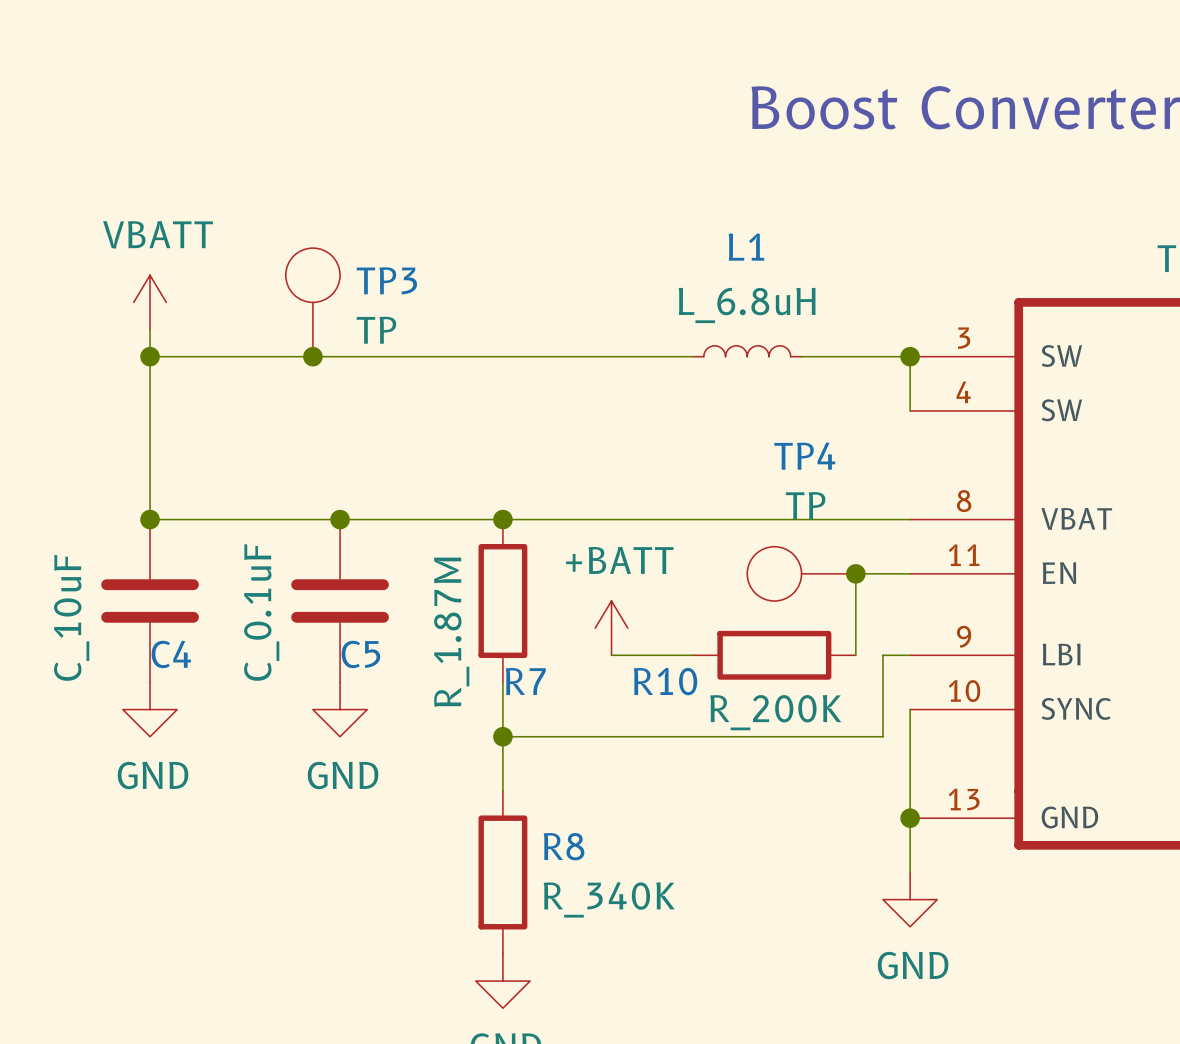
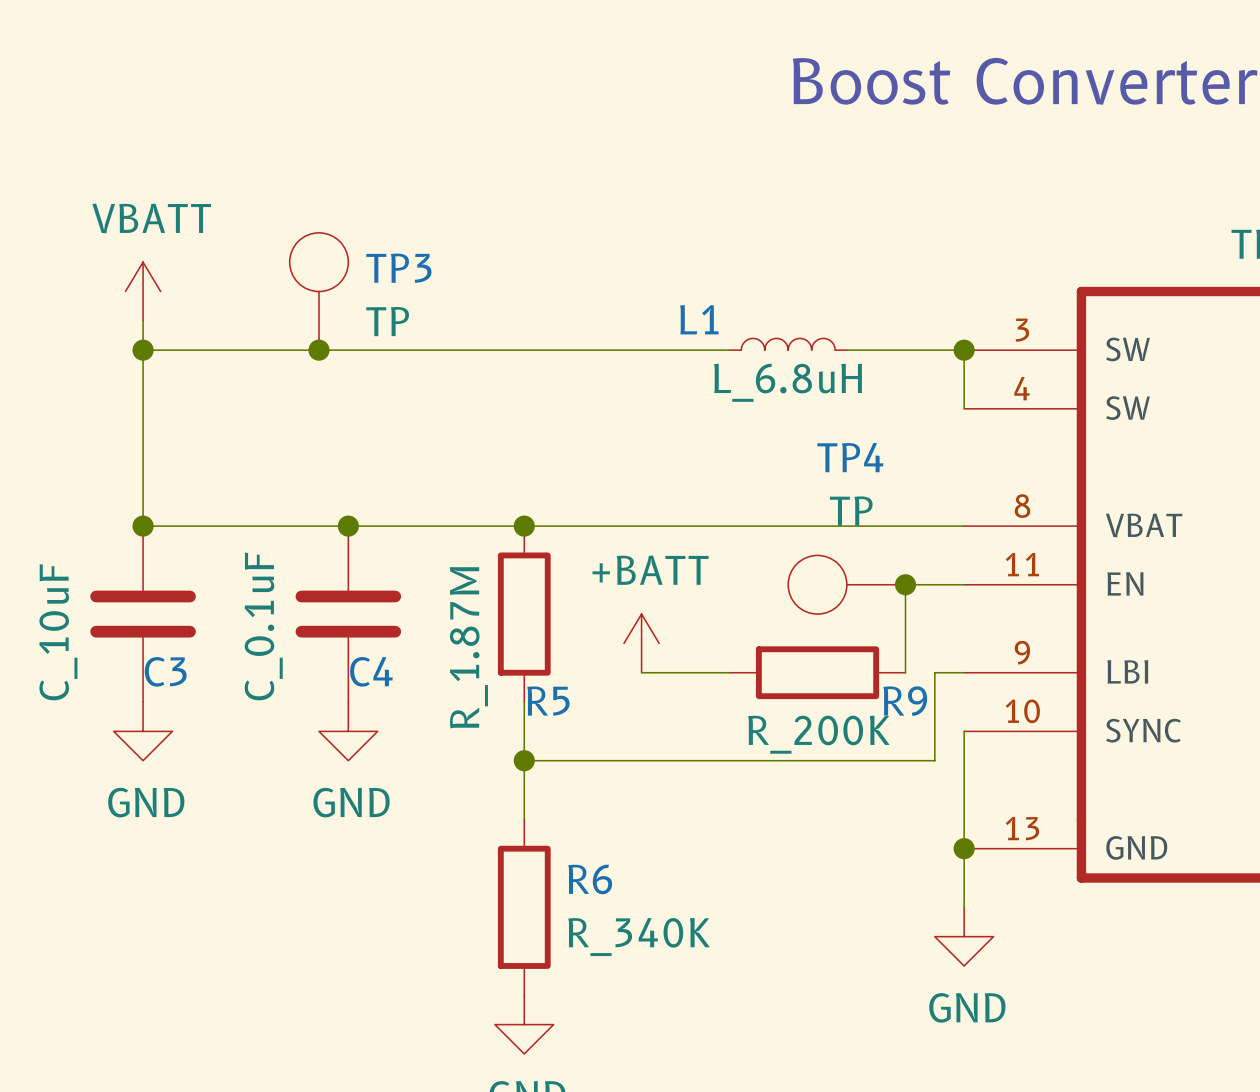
L1 name position: L1 (746, 247) -> L1 (699, 319)
L1 value position: L_6.8uH (747, 305) -> L_6.8uH (788, 382)
C4 name: C4 (171, 654) -> C3 (165, 671)
C5 name: C5 (360, 654) -> C4 (371, 671)
R7 name: R7 (525, 681) -> R5 (548, 701)
R10 name: R10 (665, 681) -> R9 (905, 701)
R8 name: R8 (564, 846) -> R6 (590, 879)

